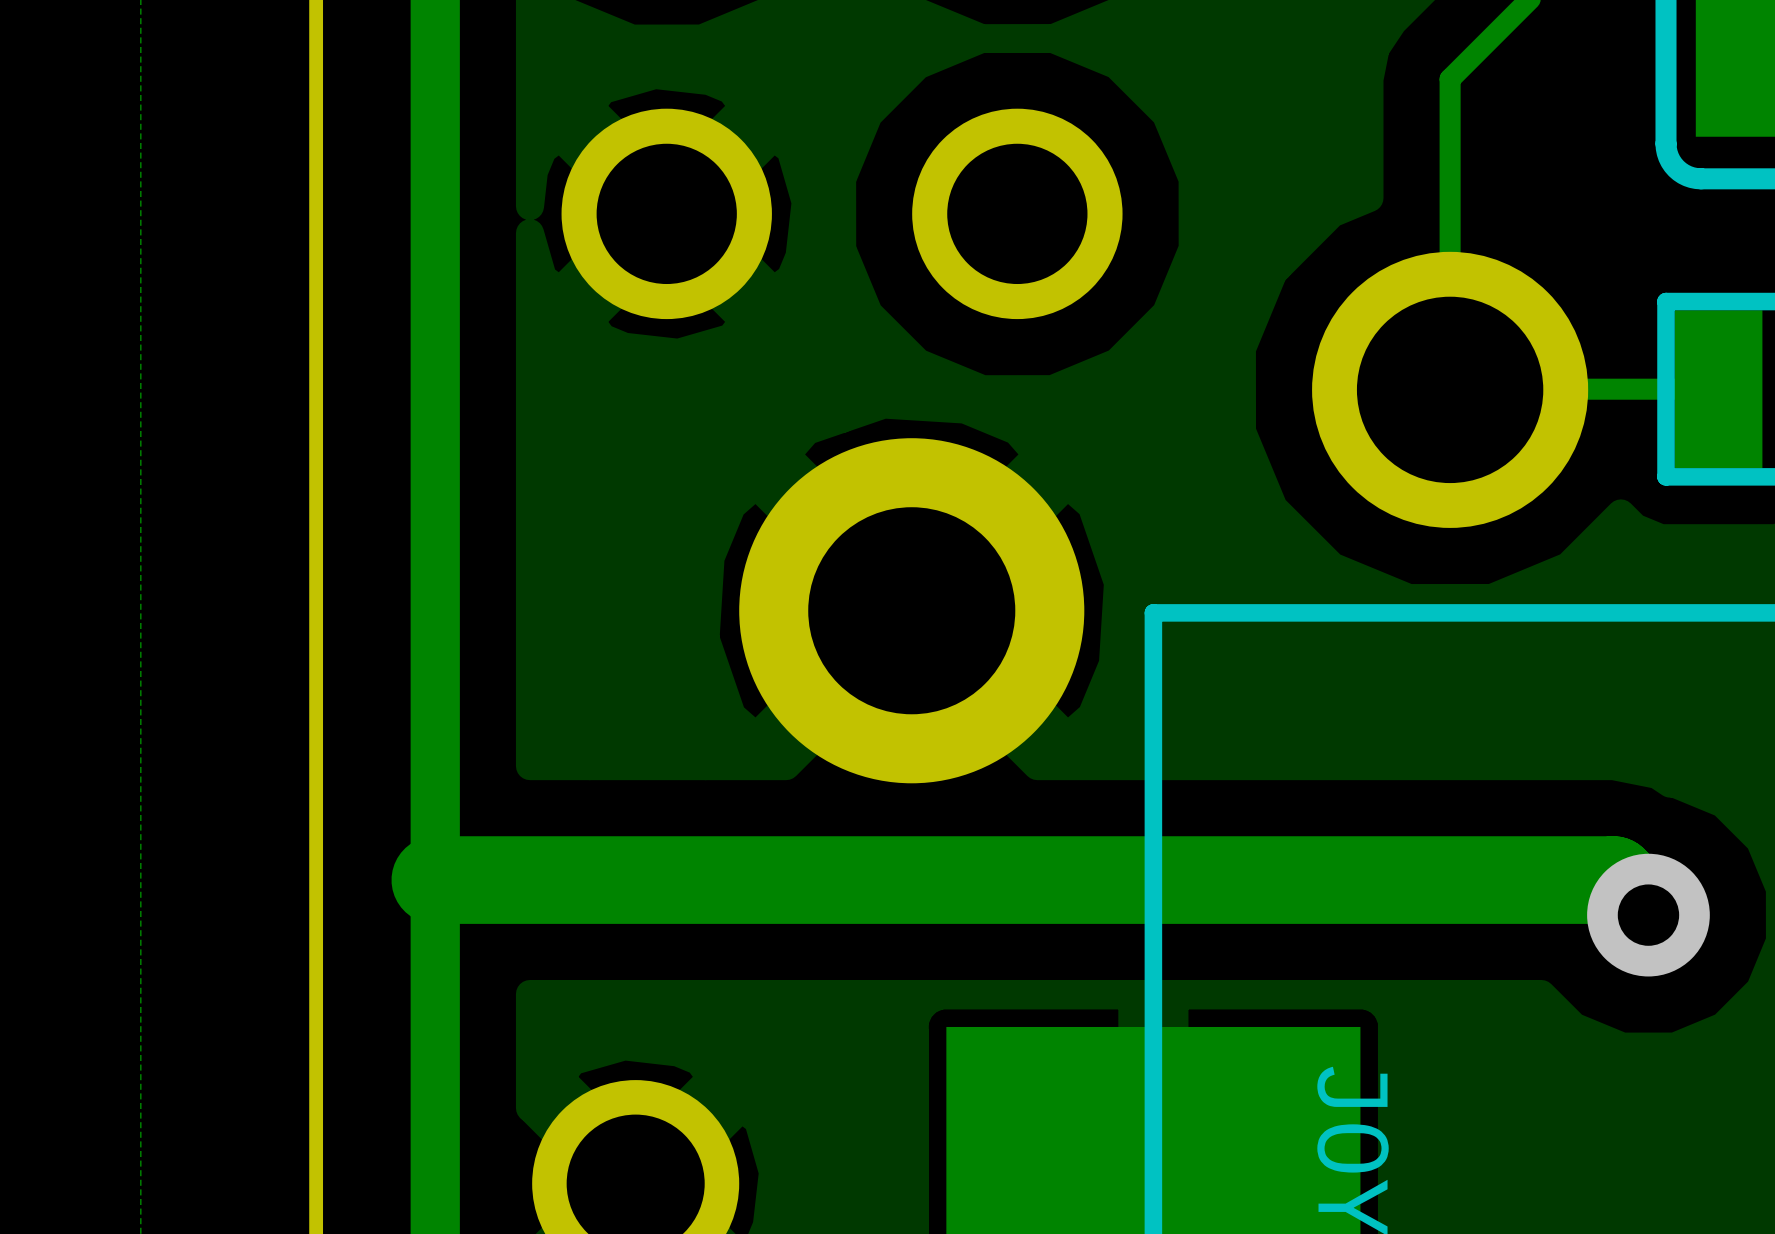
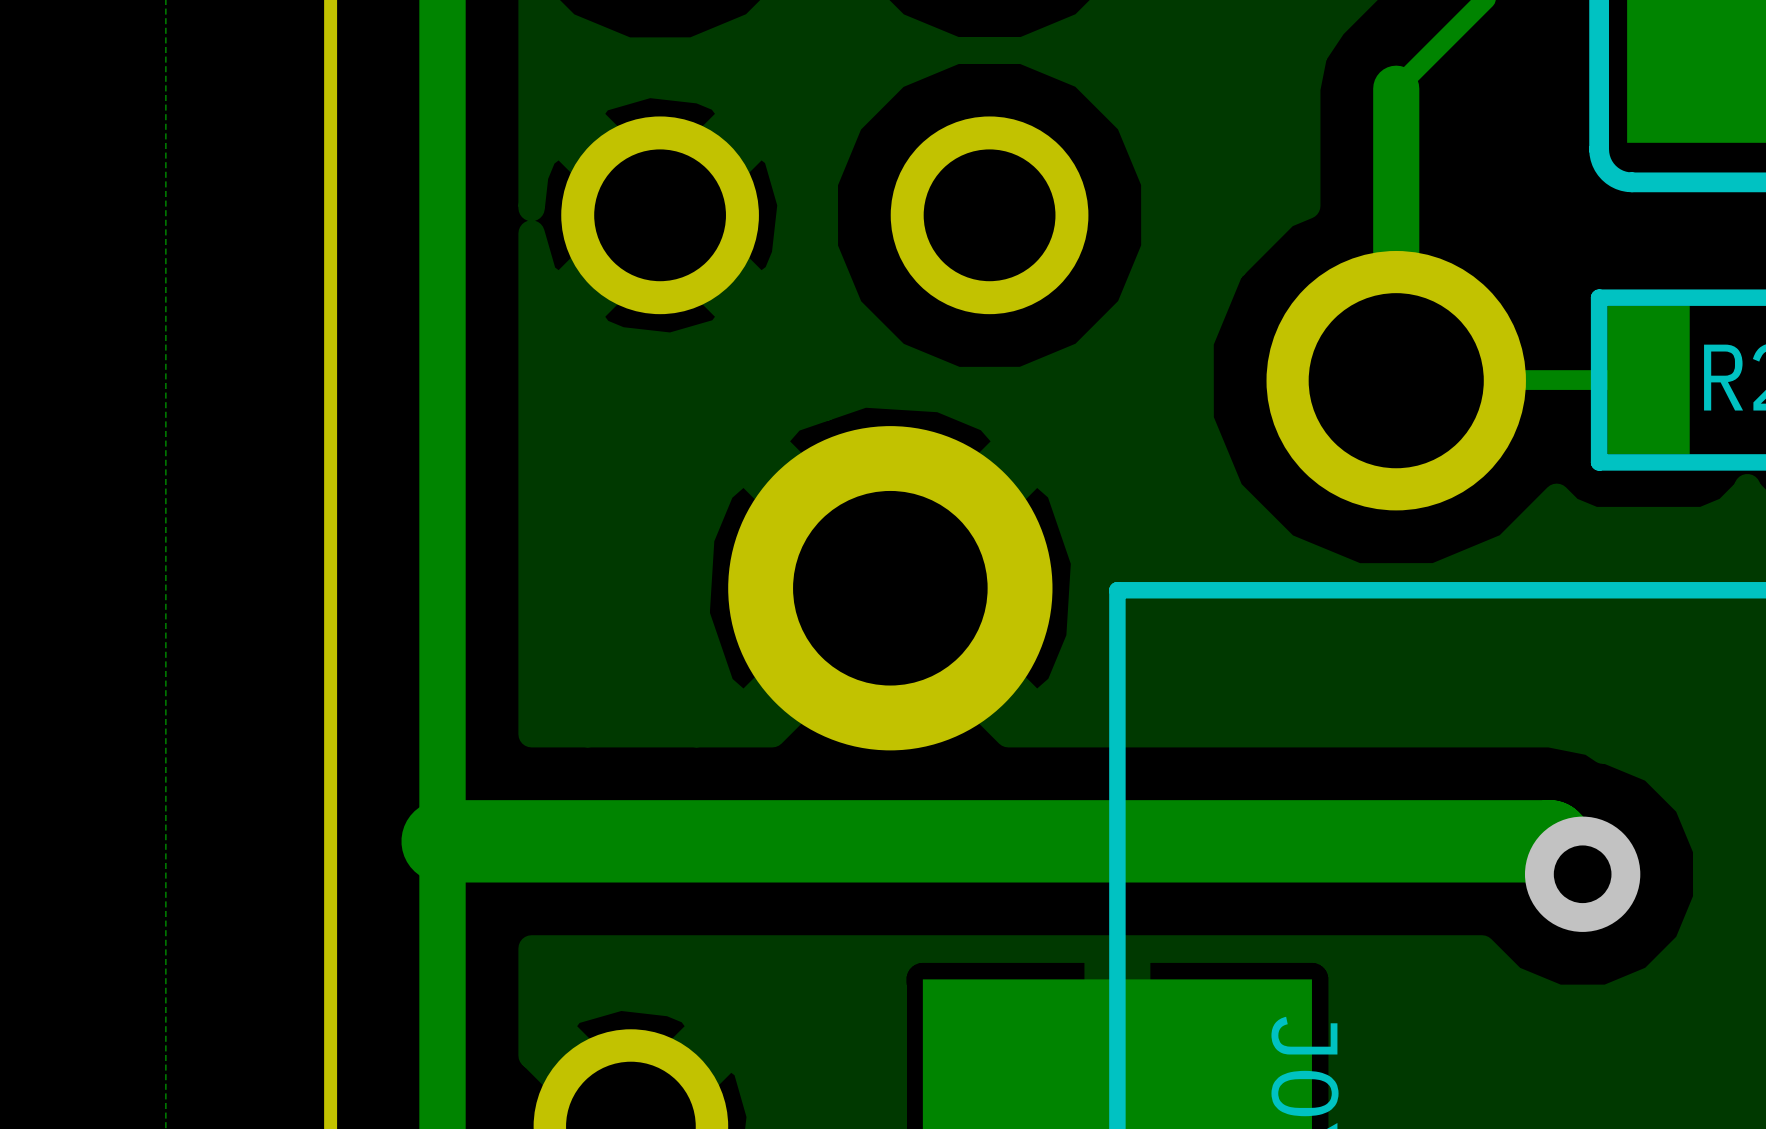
track width: thin (1450, 79) (1450, 389) -> thick (1396, 88) (1396, 380)

